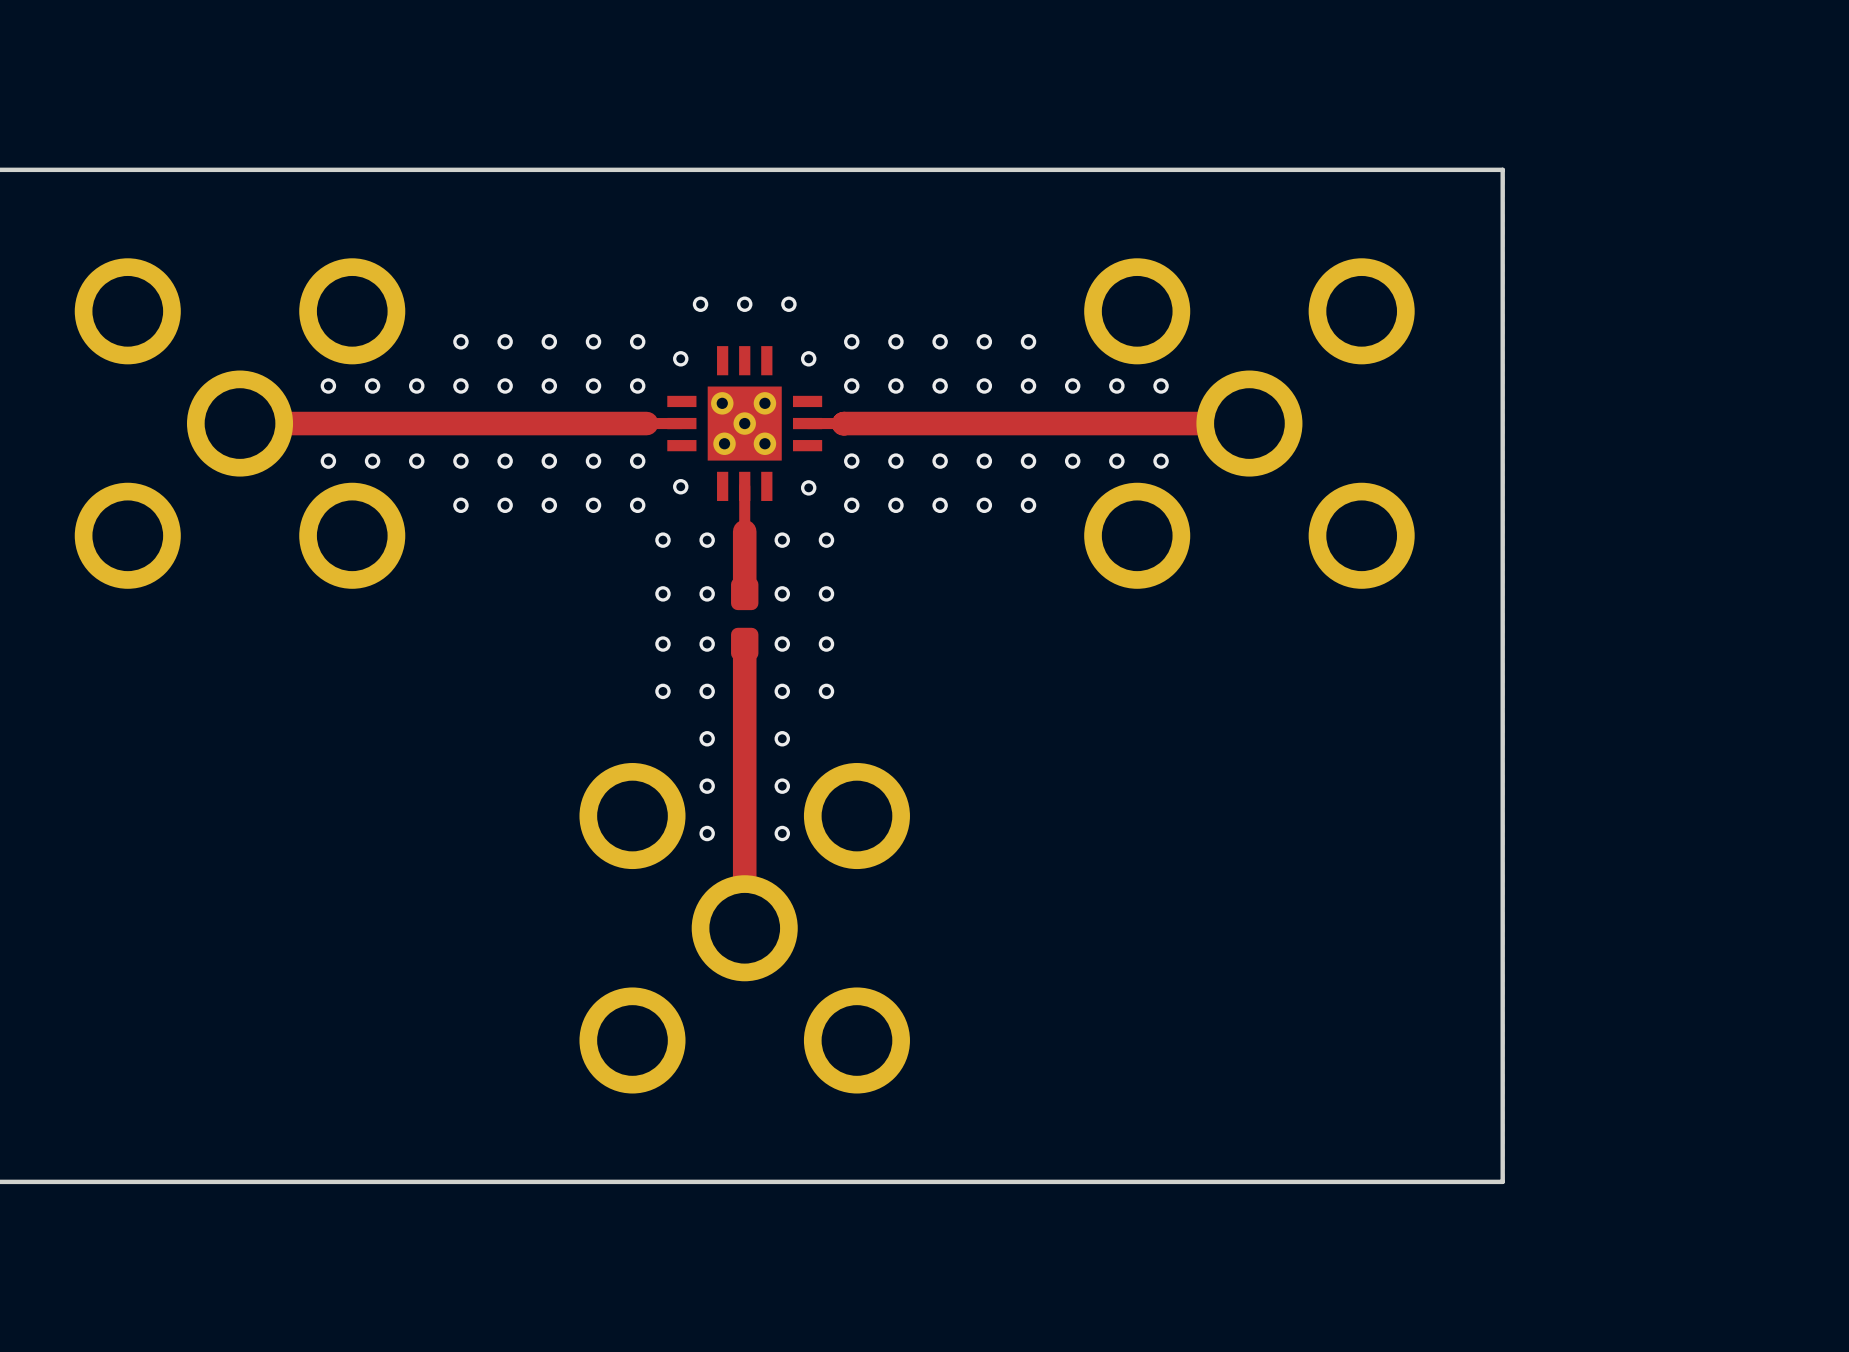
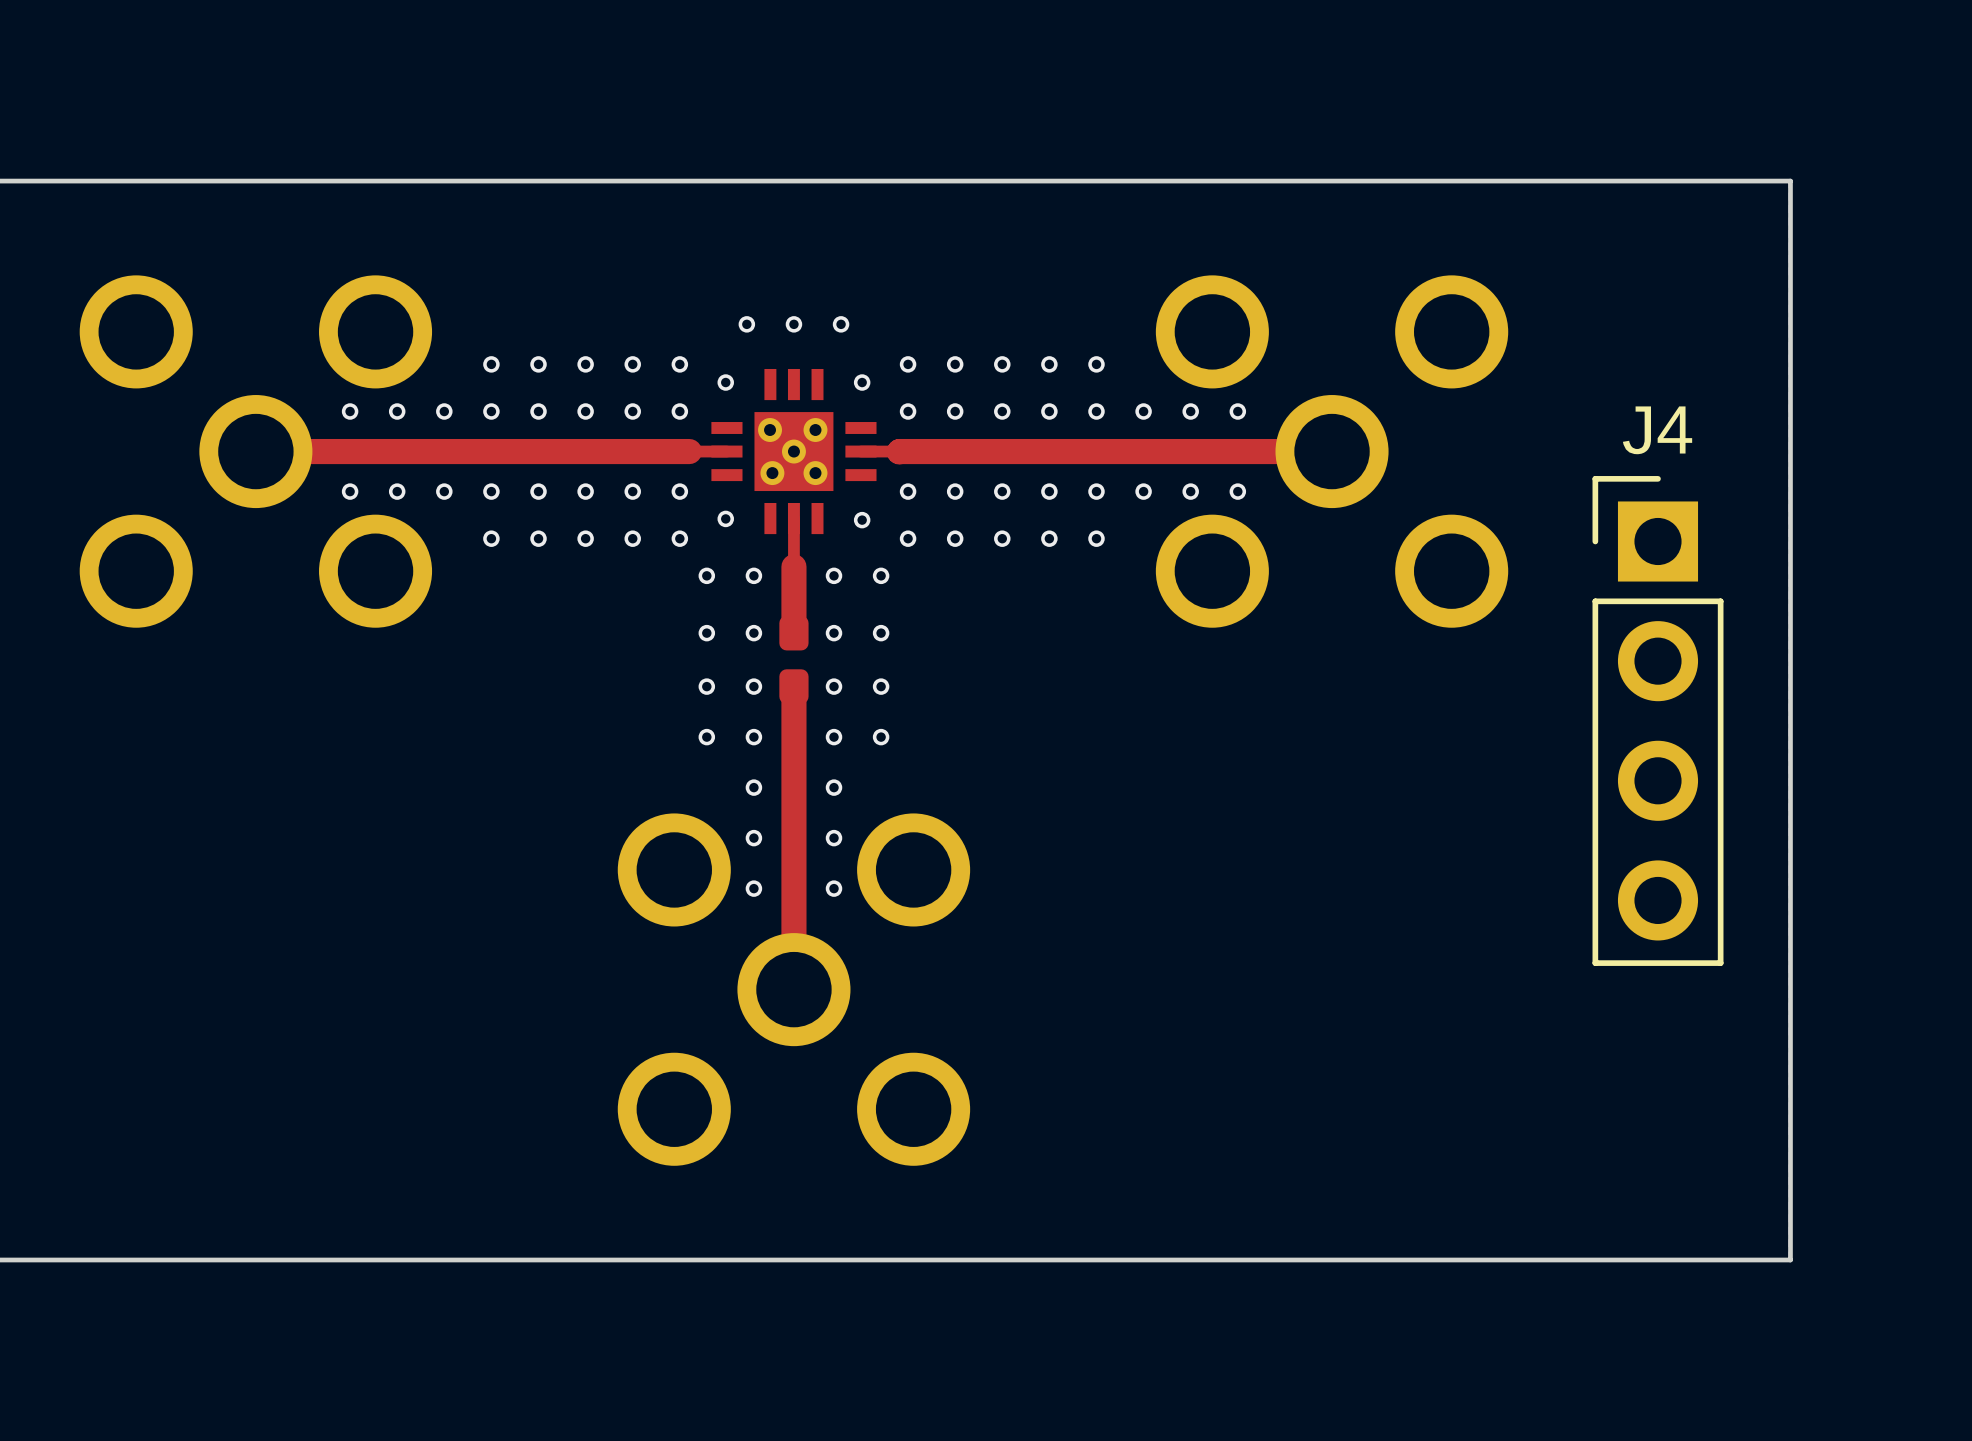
board edge: (1502, 169) (1502, 1181) -> (1602, 181) (1790, 181) (1790, 1260) (1602, 1260)
J4: none -> (1658, 720)

